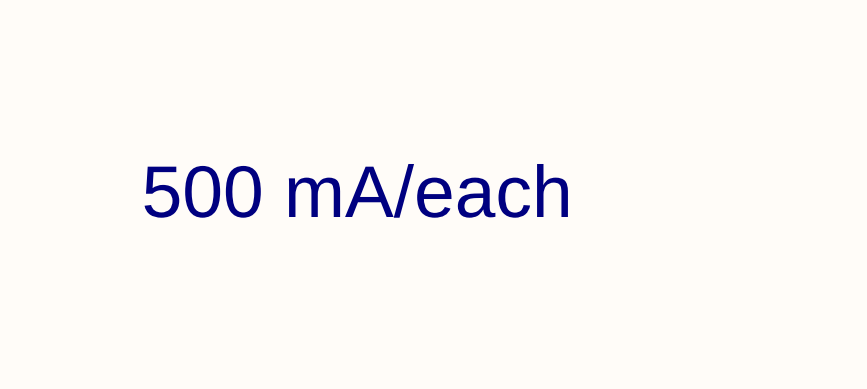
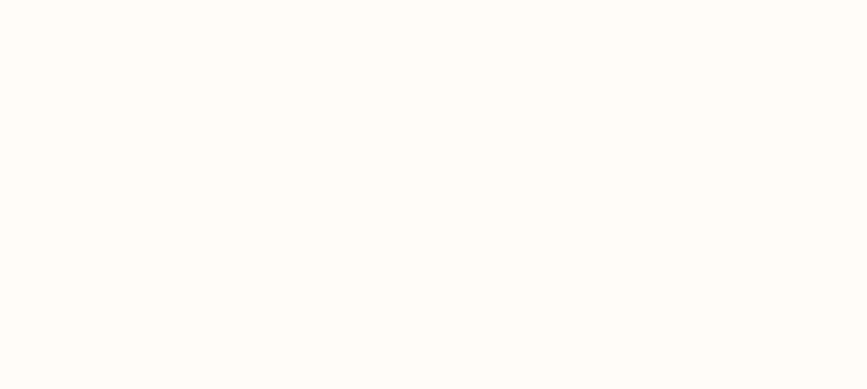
text: 500 mA/each (356, 190) -> none

